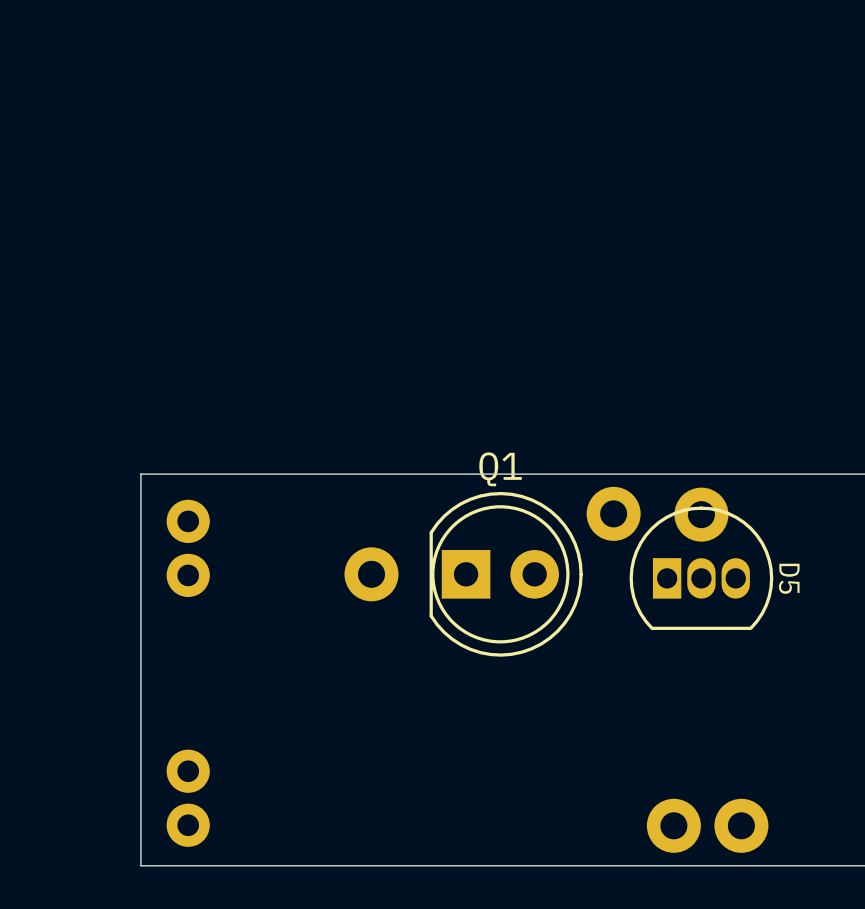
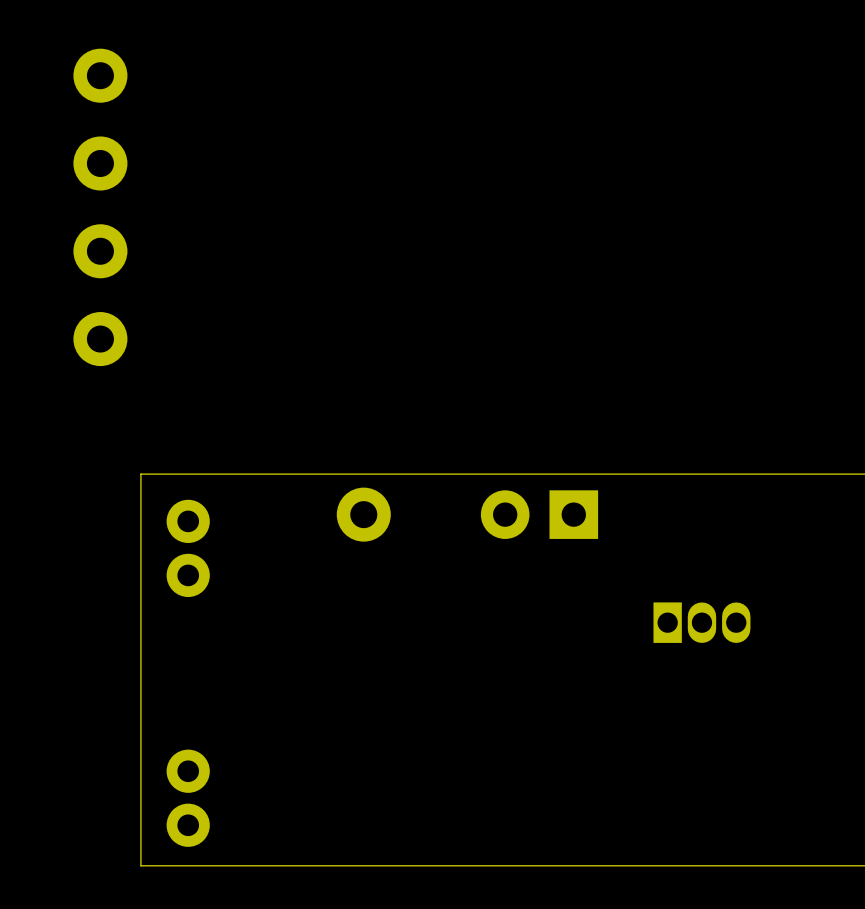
part: none -> (100, 75)
part: none -> (100, 163)
part: none -> (100, 251)
part: none -> (100, 339)
part: (613, 513) -> none
part: (701, 514) -> none
D5 side: bottom (701, 568) -> top (701, 622)
part position: (371, 574) -> (363, 514)
Q1 side: bottom (506, 574) -> top (539, 514)
part: (673, 825) -> none
part: (741, 825) -> none

